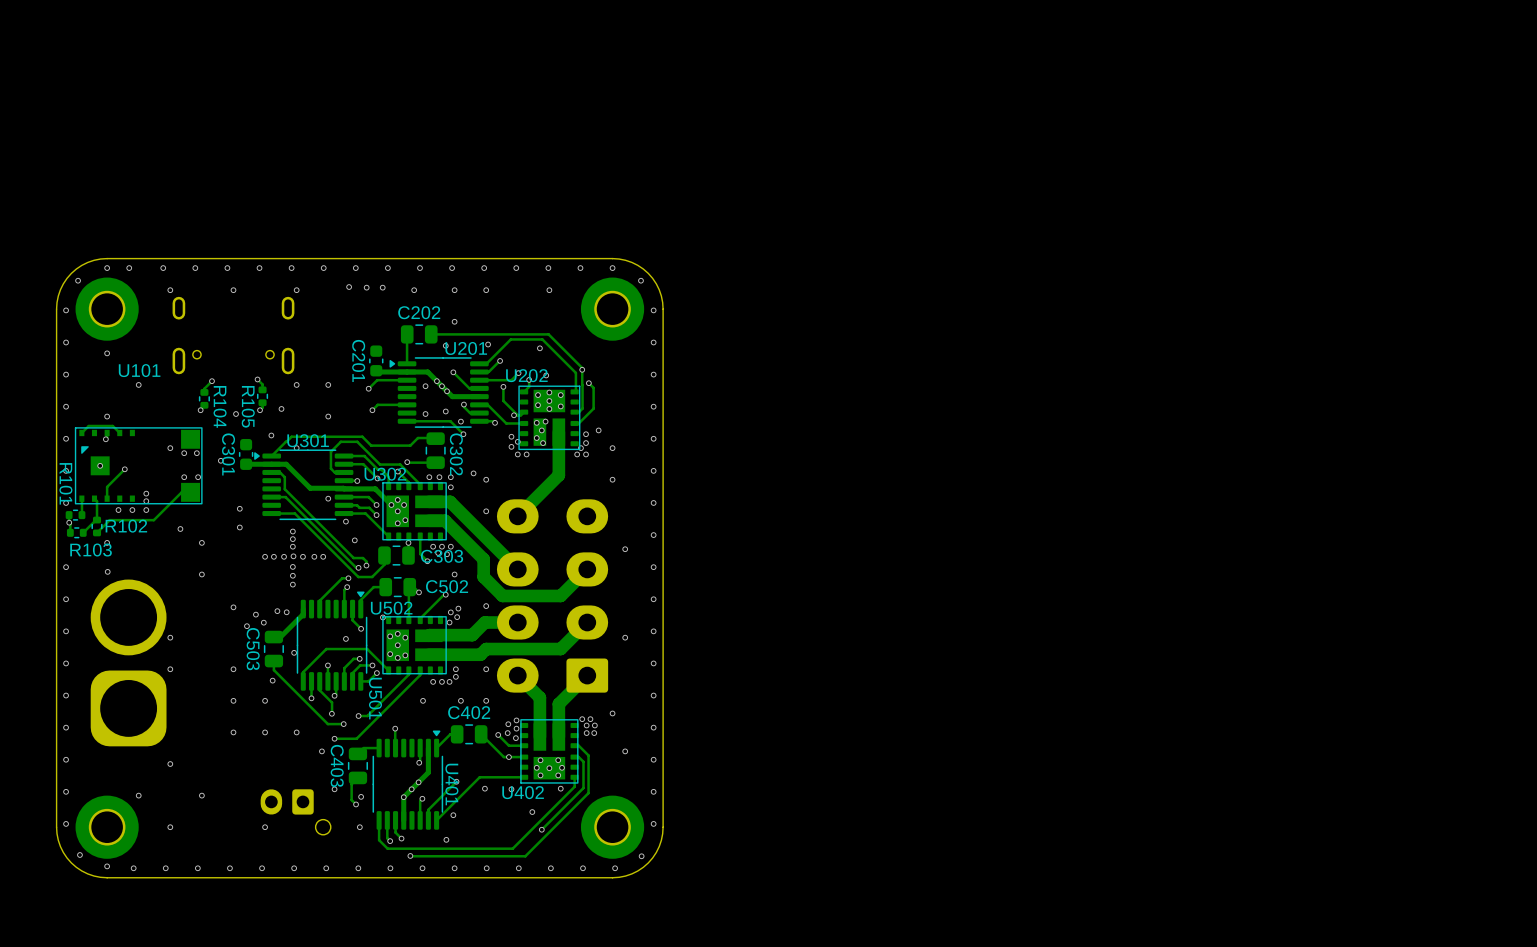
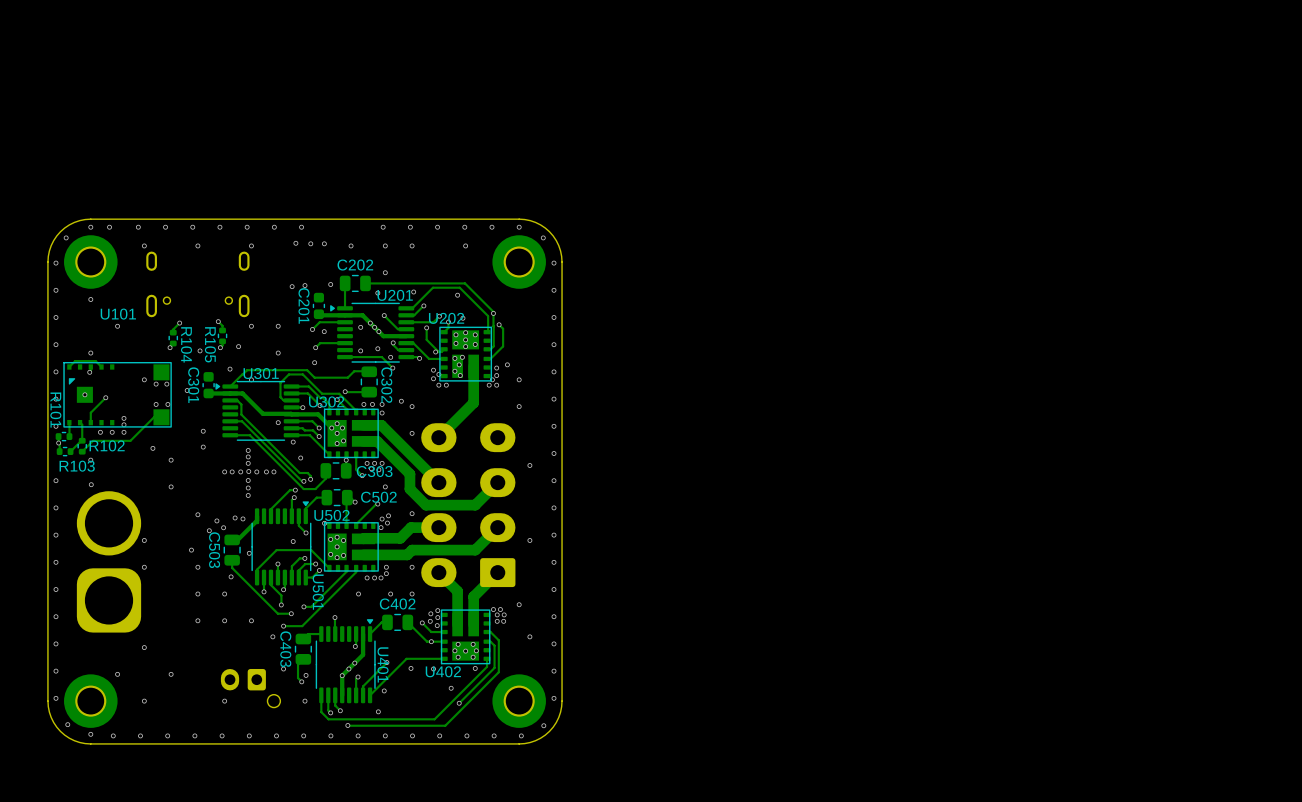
via: (387, 268) -> none
via: (419, 268) -> none
via: none -> (330, 284)
via: none -> (304, 285)
via: none -> (292, 286)
via: none -> (324, 331)
via: none -> (314, 362)
via: none -> (191, 550)

